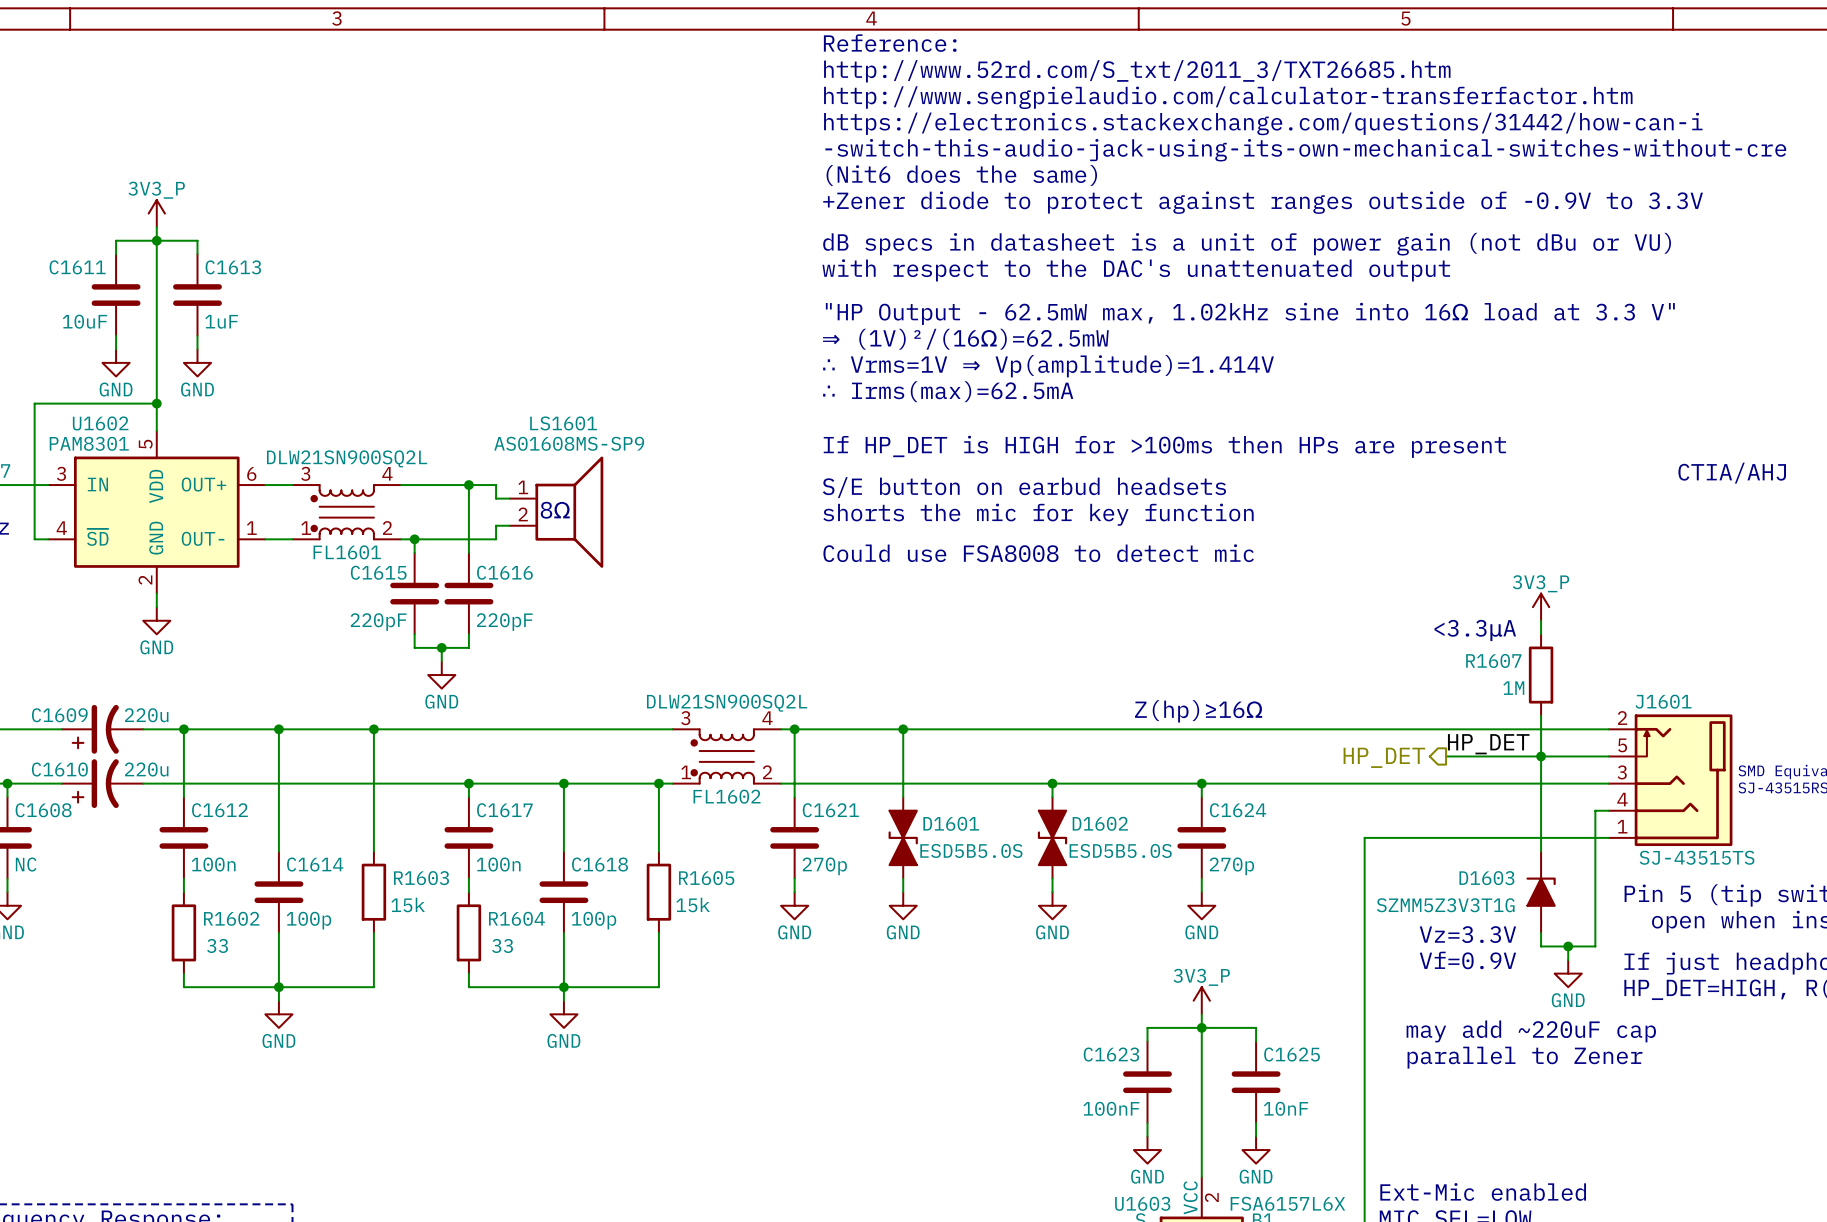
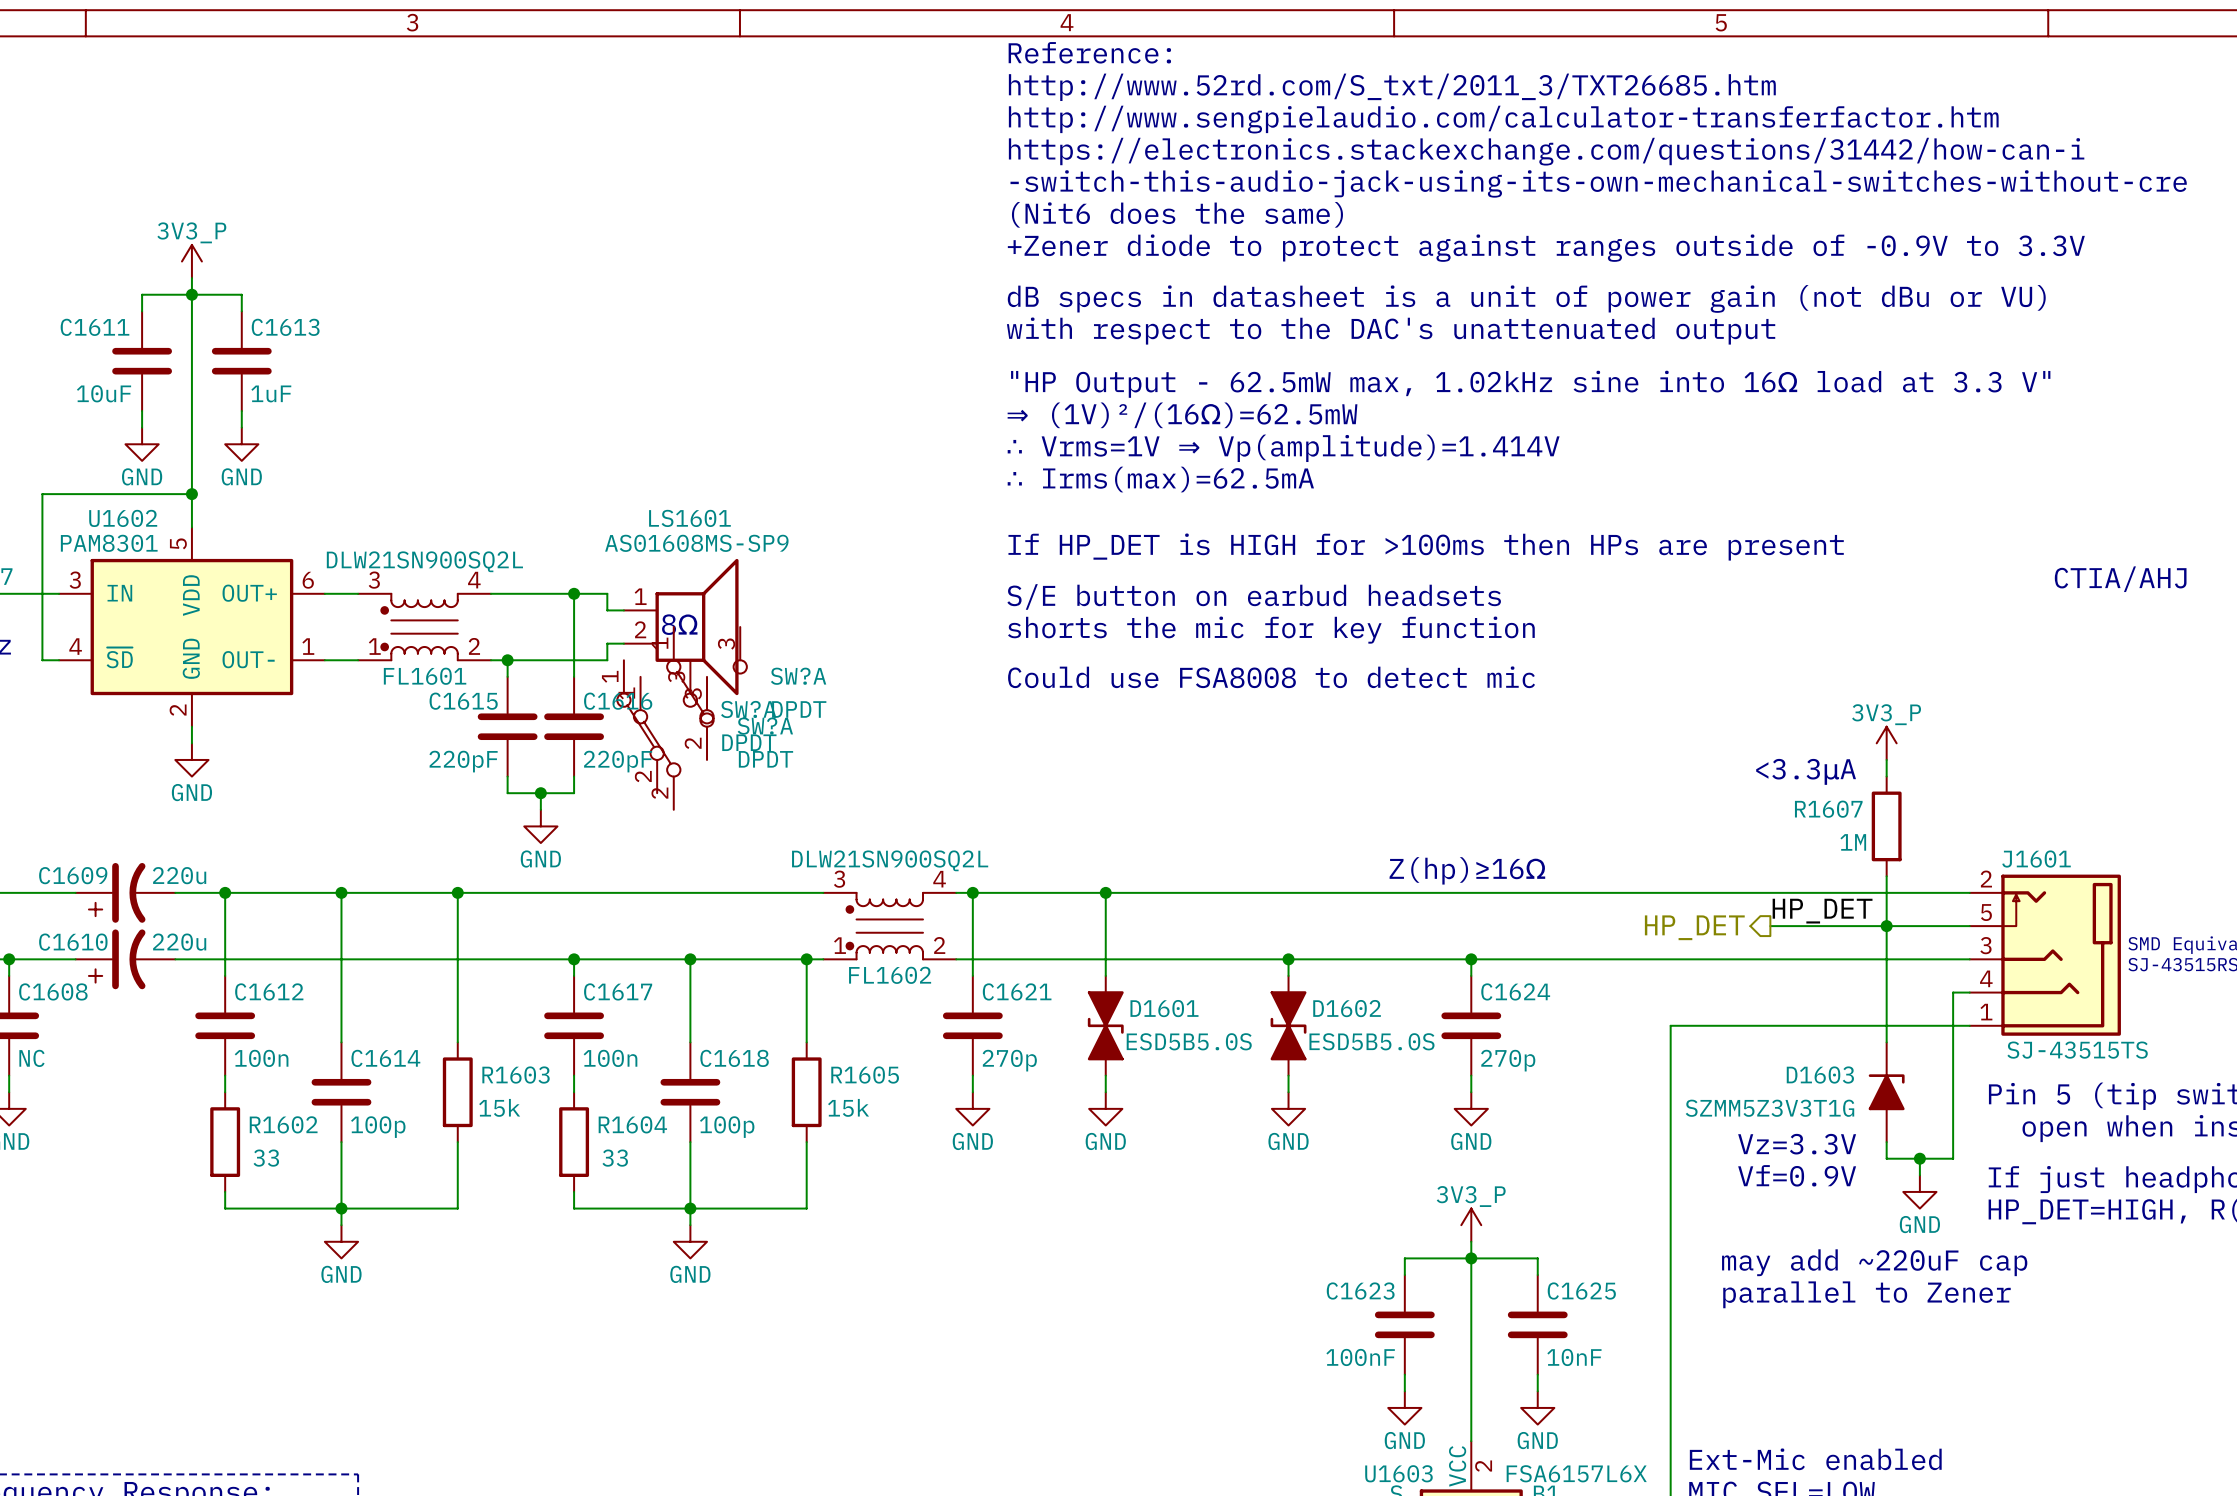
SW?A: none -> DPDT (707, 693)
SW?A: none -> DPDT (657, 726)
SW?A: none -> DPDT (673, 743)

